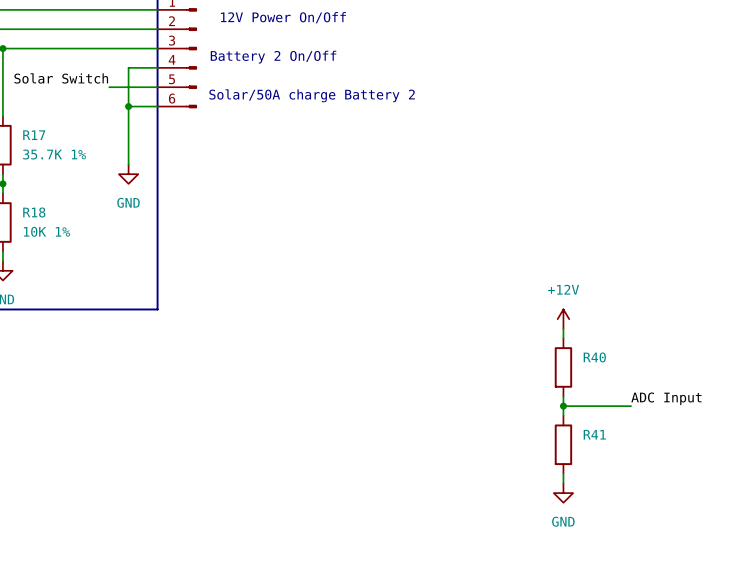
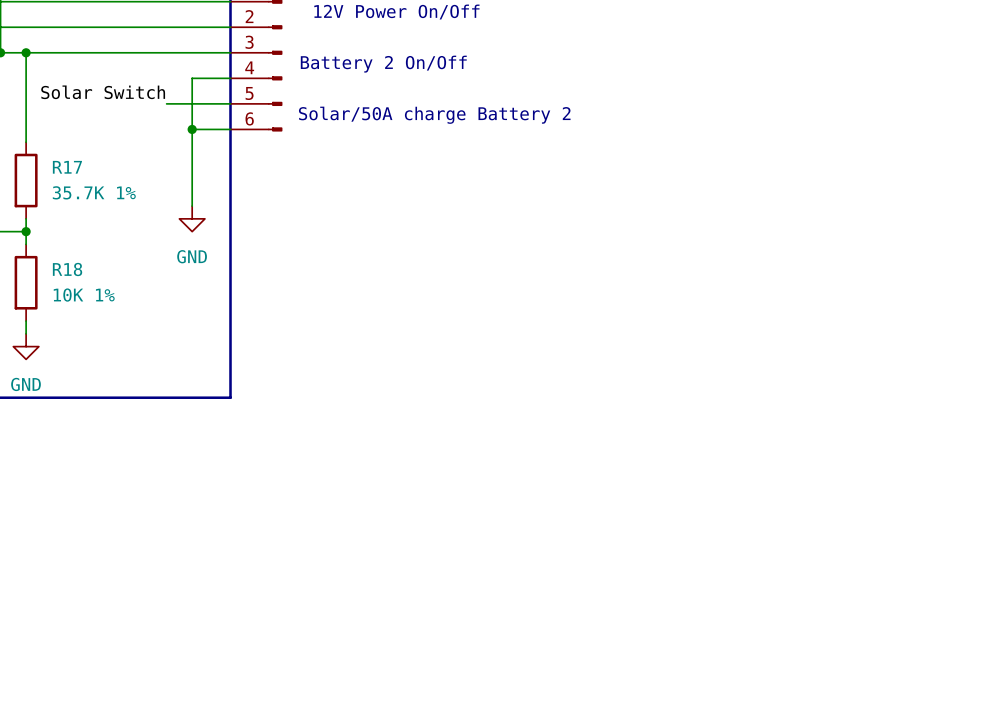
power symbol: +12V (563, 319) -> none
wire: (563, 328) (563, 338) -> none
R40: (563, 367) -> none
wire: (563, 396) (563, 415) -> none
label: ADC Input (666, 398) -> none
wire: (563, 406) (631, 406) -> none
junction: (563, 406) -> none
R41: (563, 444) -> none
wire: (563, 473) (563, 483) -> none
power symbol: GND (563, 493) -> none

